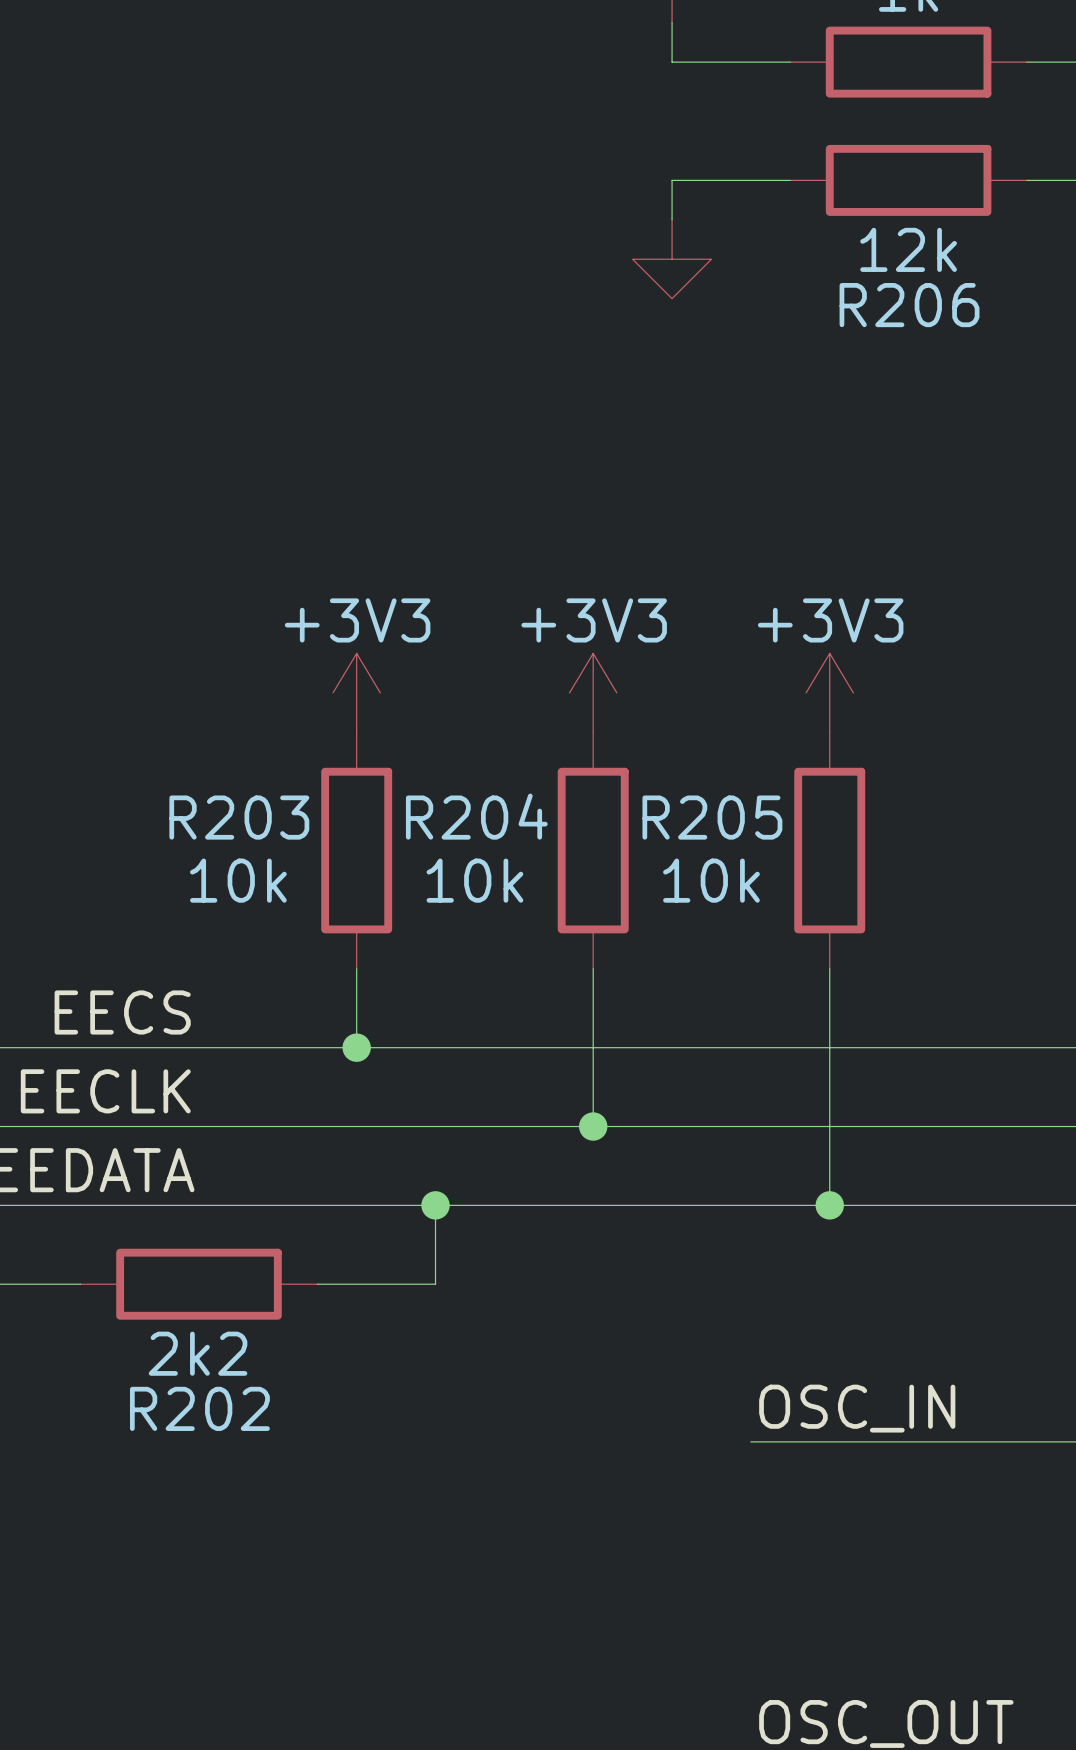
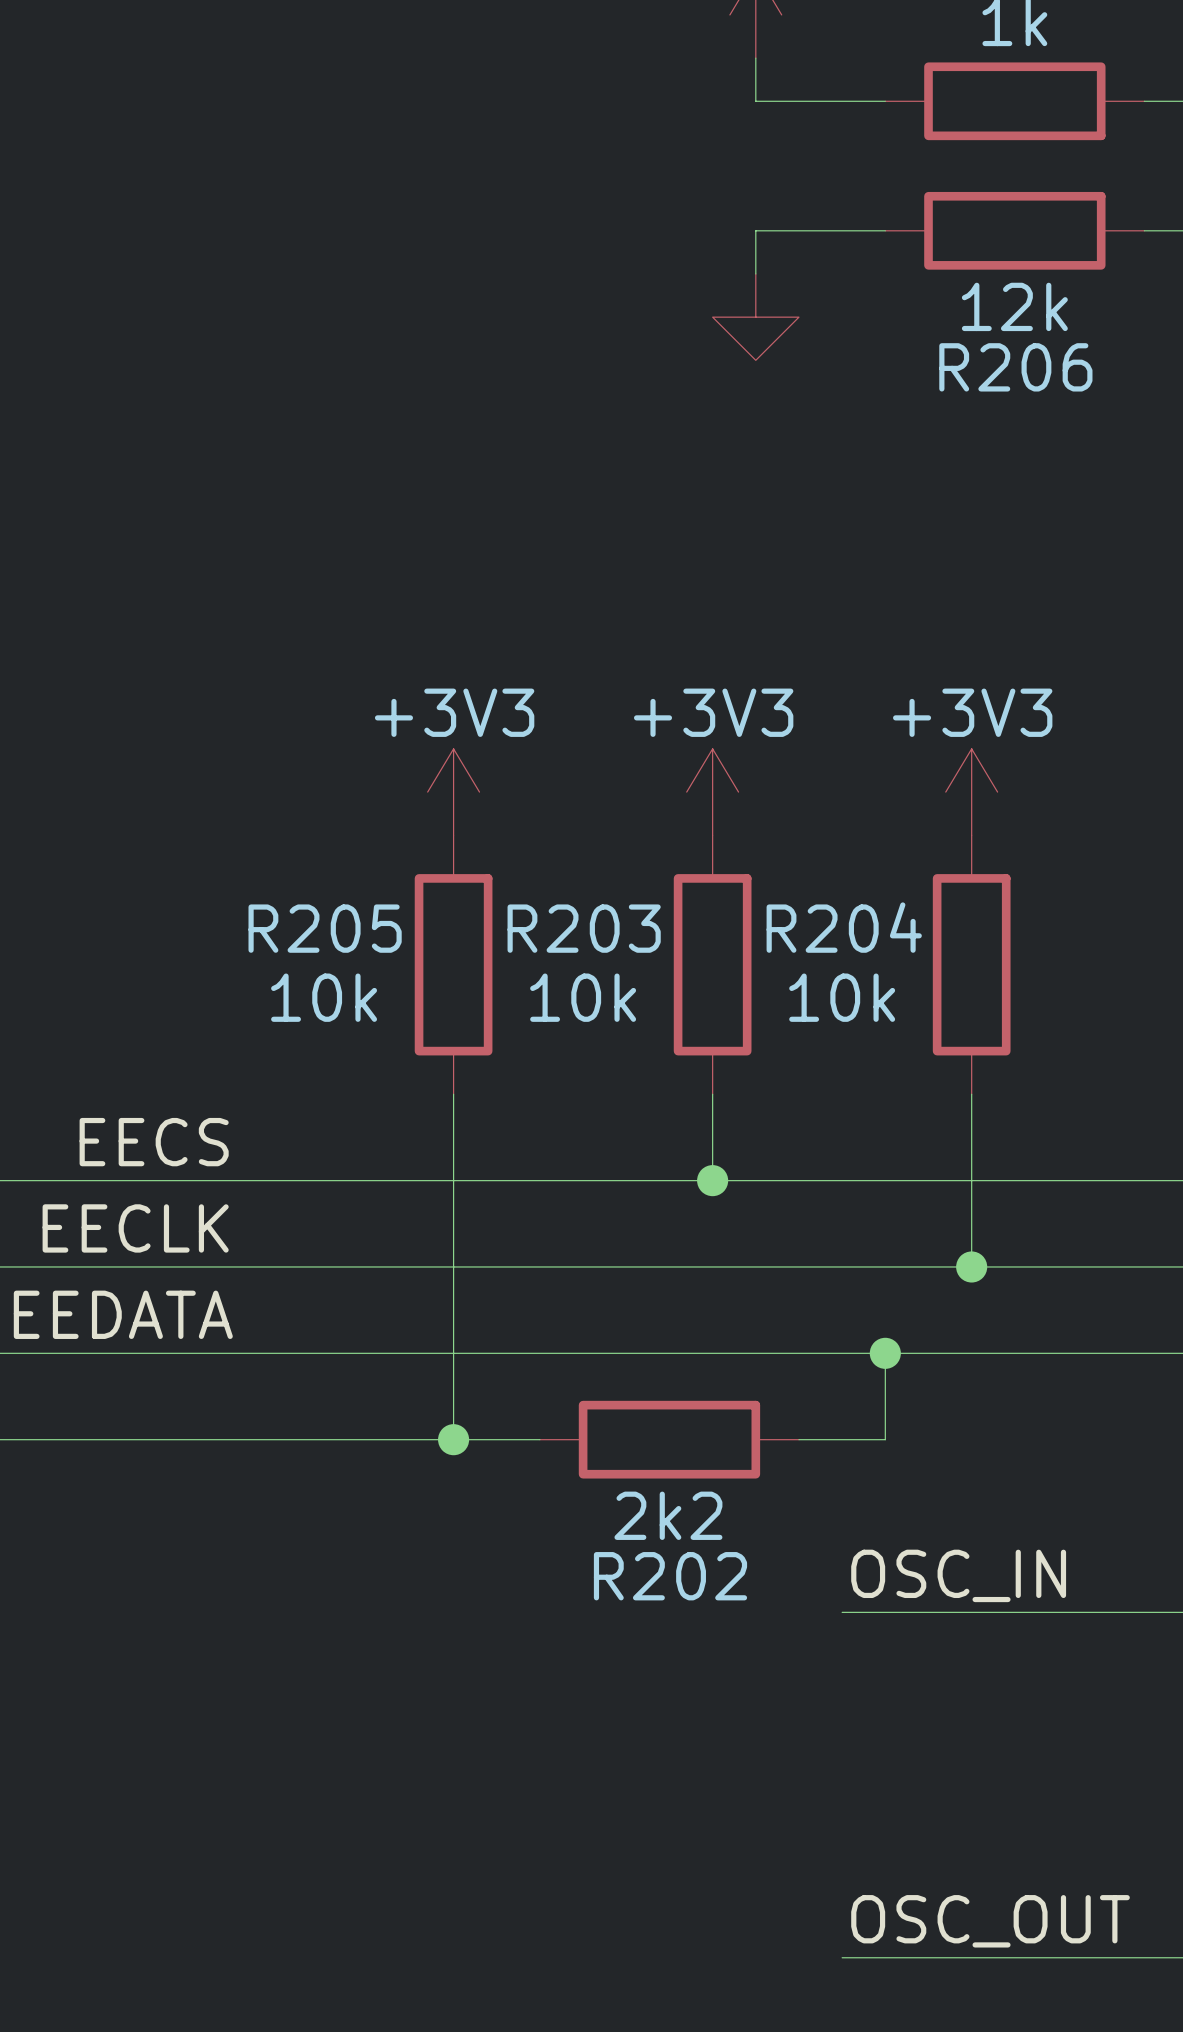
power symbol position: +3V3 (356, 692) -> +3V3 (453, 792)
power symbol position: +3V3 (593, 692) -> +3V3 (712, 792)
power symbol position: +3V3 (829, 692) -> +3V3 (971, 792)
R203 position: (356, 850) -> (712, 964)
R204 position: (593, 850) -> (971, 964)
R205 position: (829, 850) -> (453, 964)
wire: (356, 968) (356, 1047) -> (712, 1094) (712, 1180)
wire: none -> (453, 1094) (453, 1439)
wire: (593, 968) (593, 1126) -> (971, 1094) (971, 1266)
wire: (829, 968) (829, 1205) -> none
junction: (356, 1047) -> none
junction position: (593, 1126) -> (712, 1180)
junction: none -> (971, 1266)
wire: (435, 1205) (435, 1284) -> (539, 1439) (496, 1439)
junction position: (435, 1205) -> (453, 1439)
wire: none -> (885, 1353) (885, 1439) (798, 1439)
junction position: (829, 1205) -> (885, 1353)
wire: none -> (108, 1439) (367, 1439)
R202 position: (198, 1284) -> (669, 1439)

